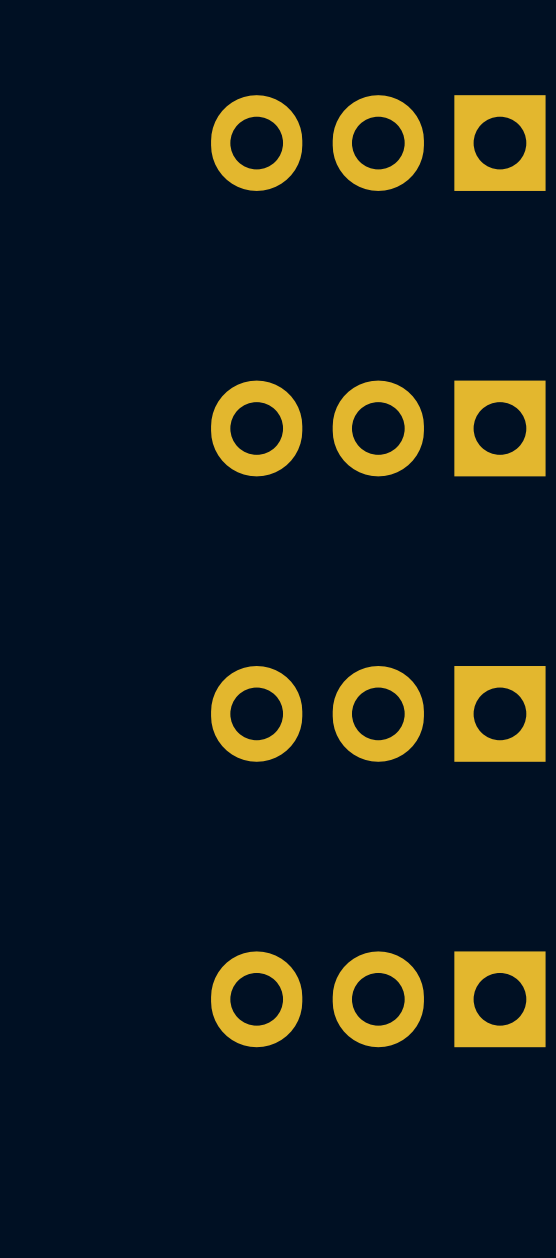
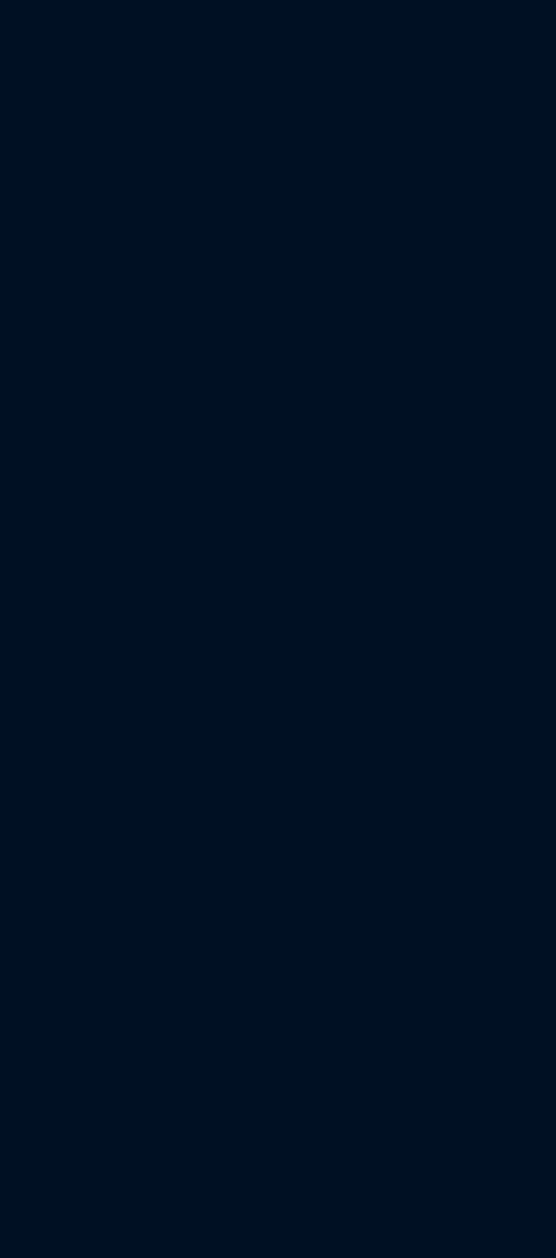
part: (378, 143) -> none
part: (378, 428) -> none
part: (378, 713) -> none
part: (378, 999) -> none

